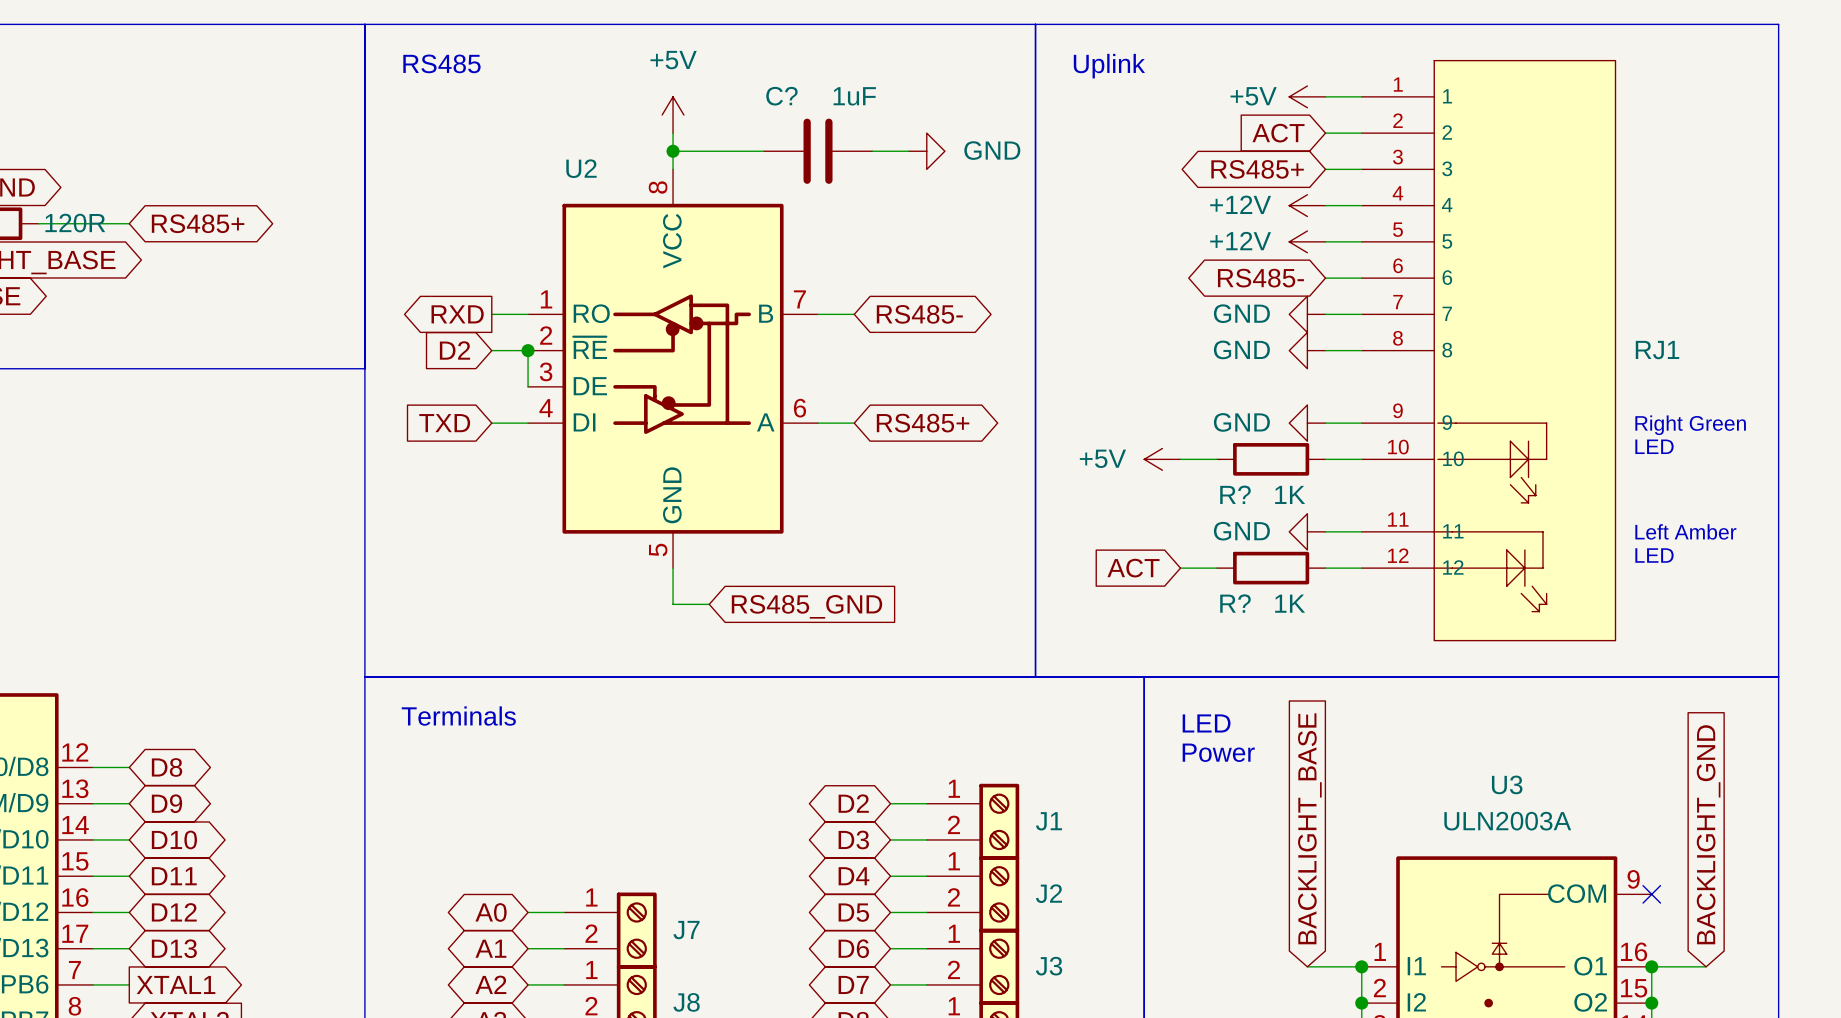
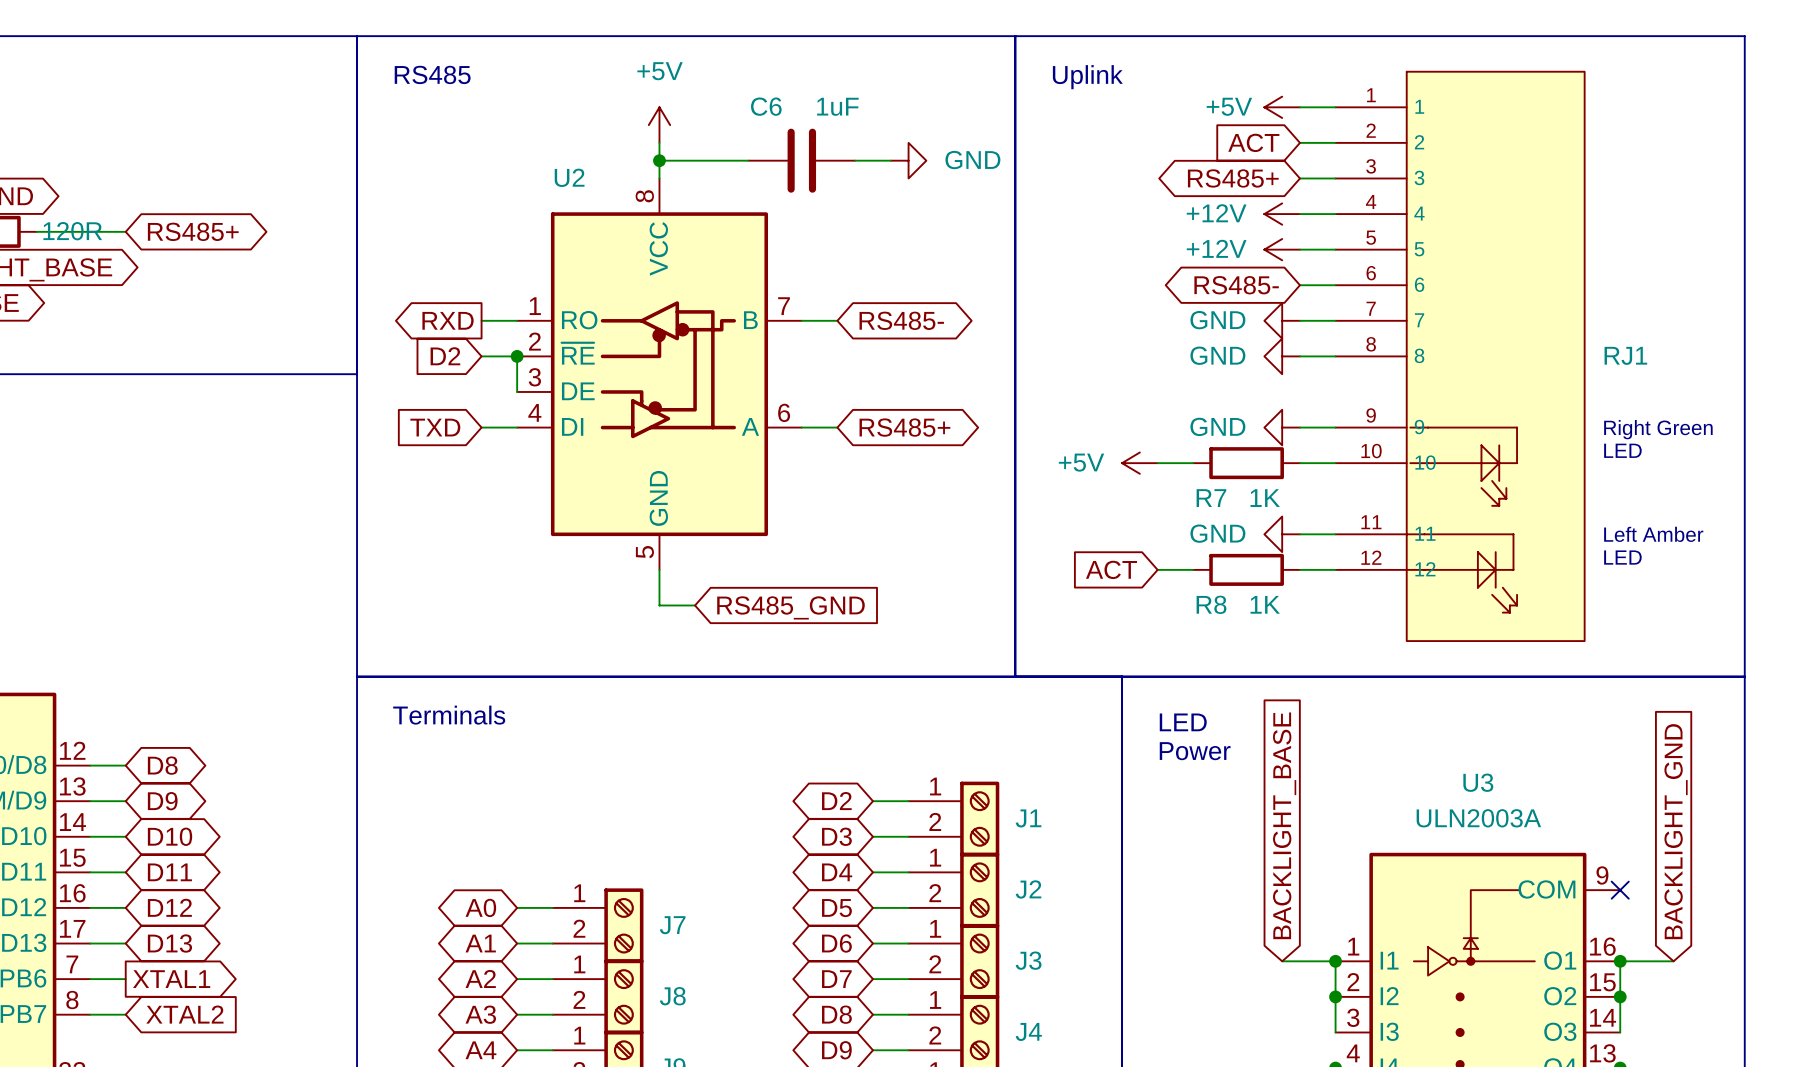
C? name: C? (781, 96) -> C6 (766, 106)
R? name: R? (1235, 494) -> R7 (1211, 498)
R? name: R? (1235, 603) -> R8 (1211, 604)

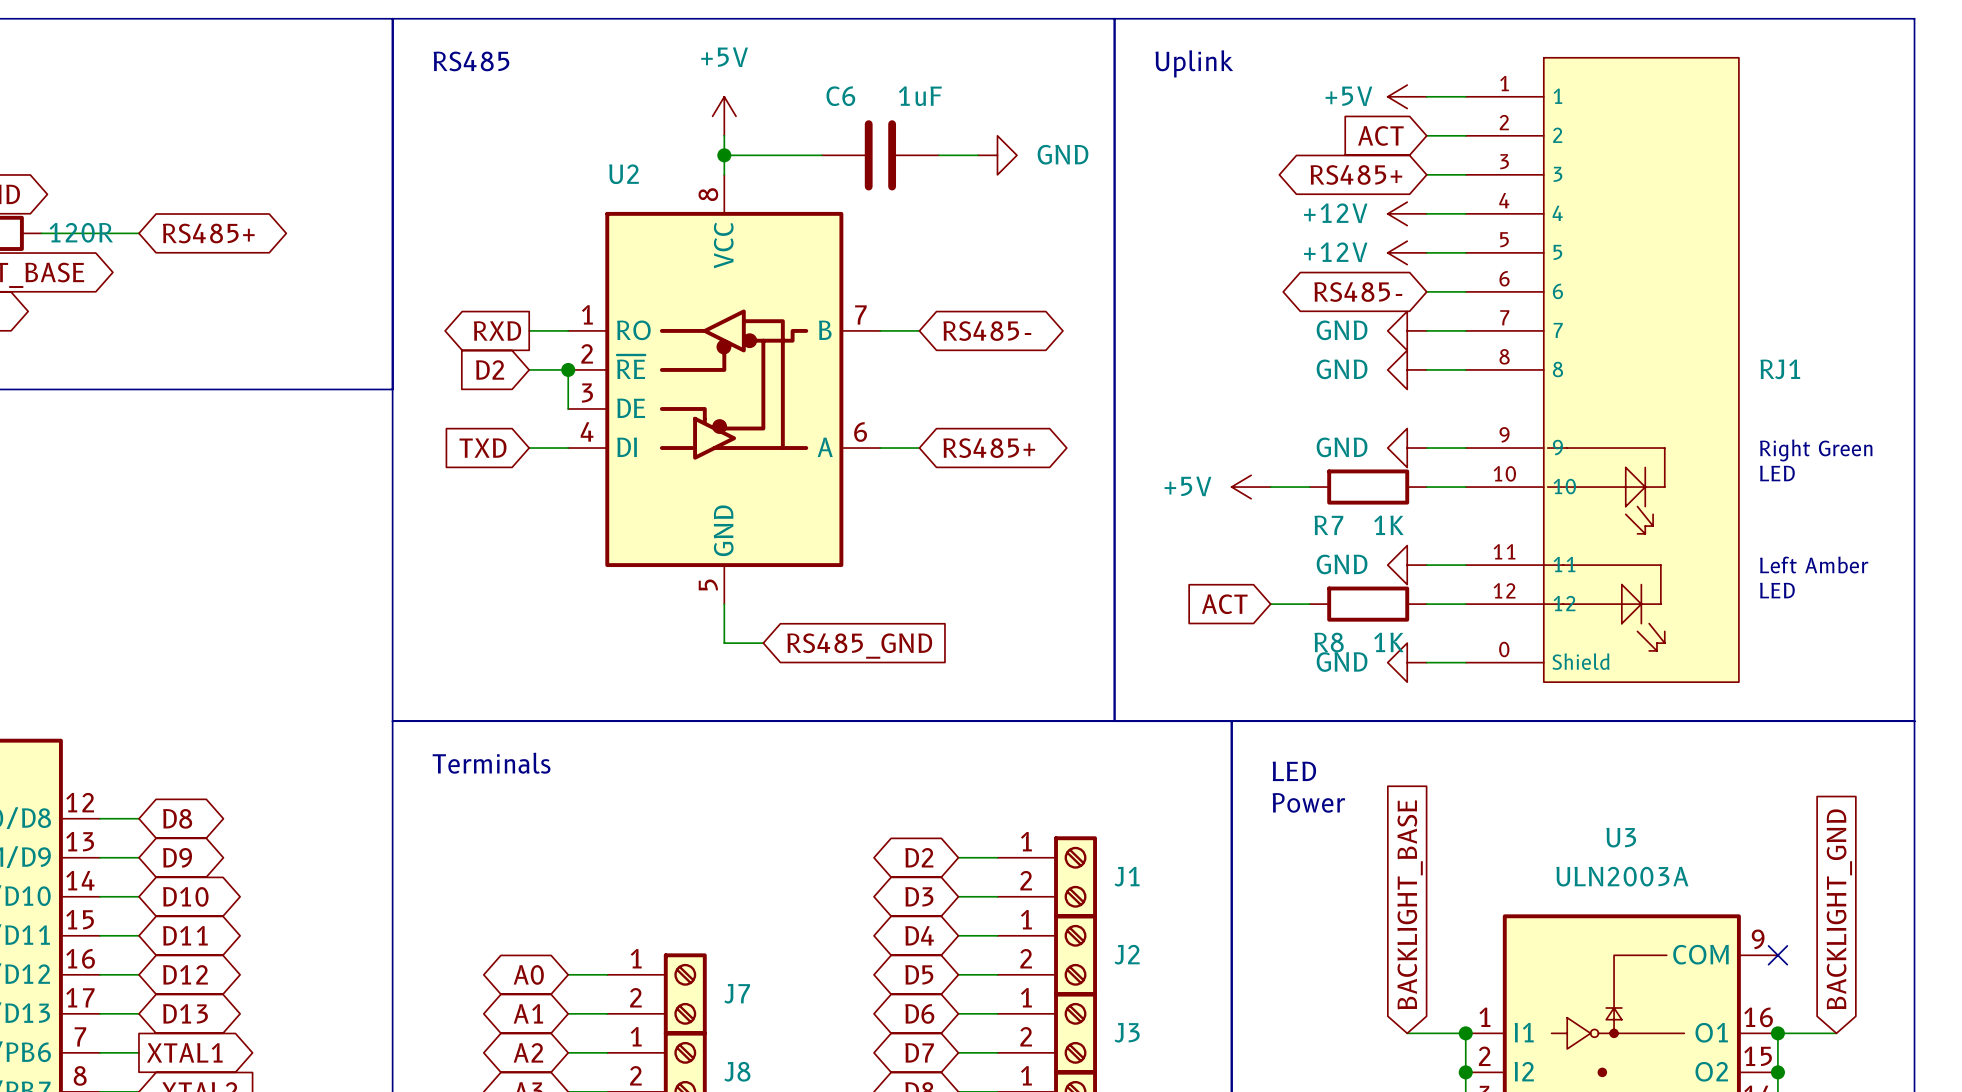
RJ1 symbol: [1335, 71, 1585, 642] -> [1465, 57, 1739, 683]
power symbol: none -> GND (1407, 662)
wire: none -> (1426, 662) (1465, 662)

